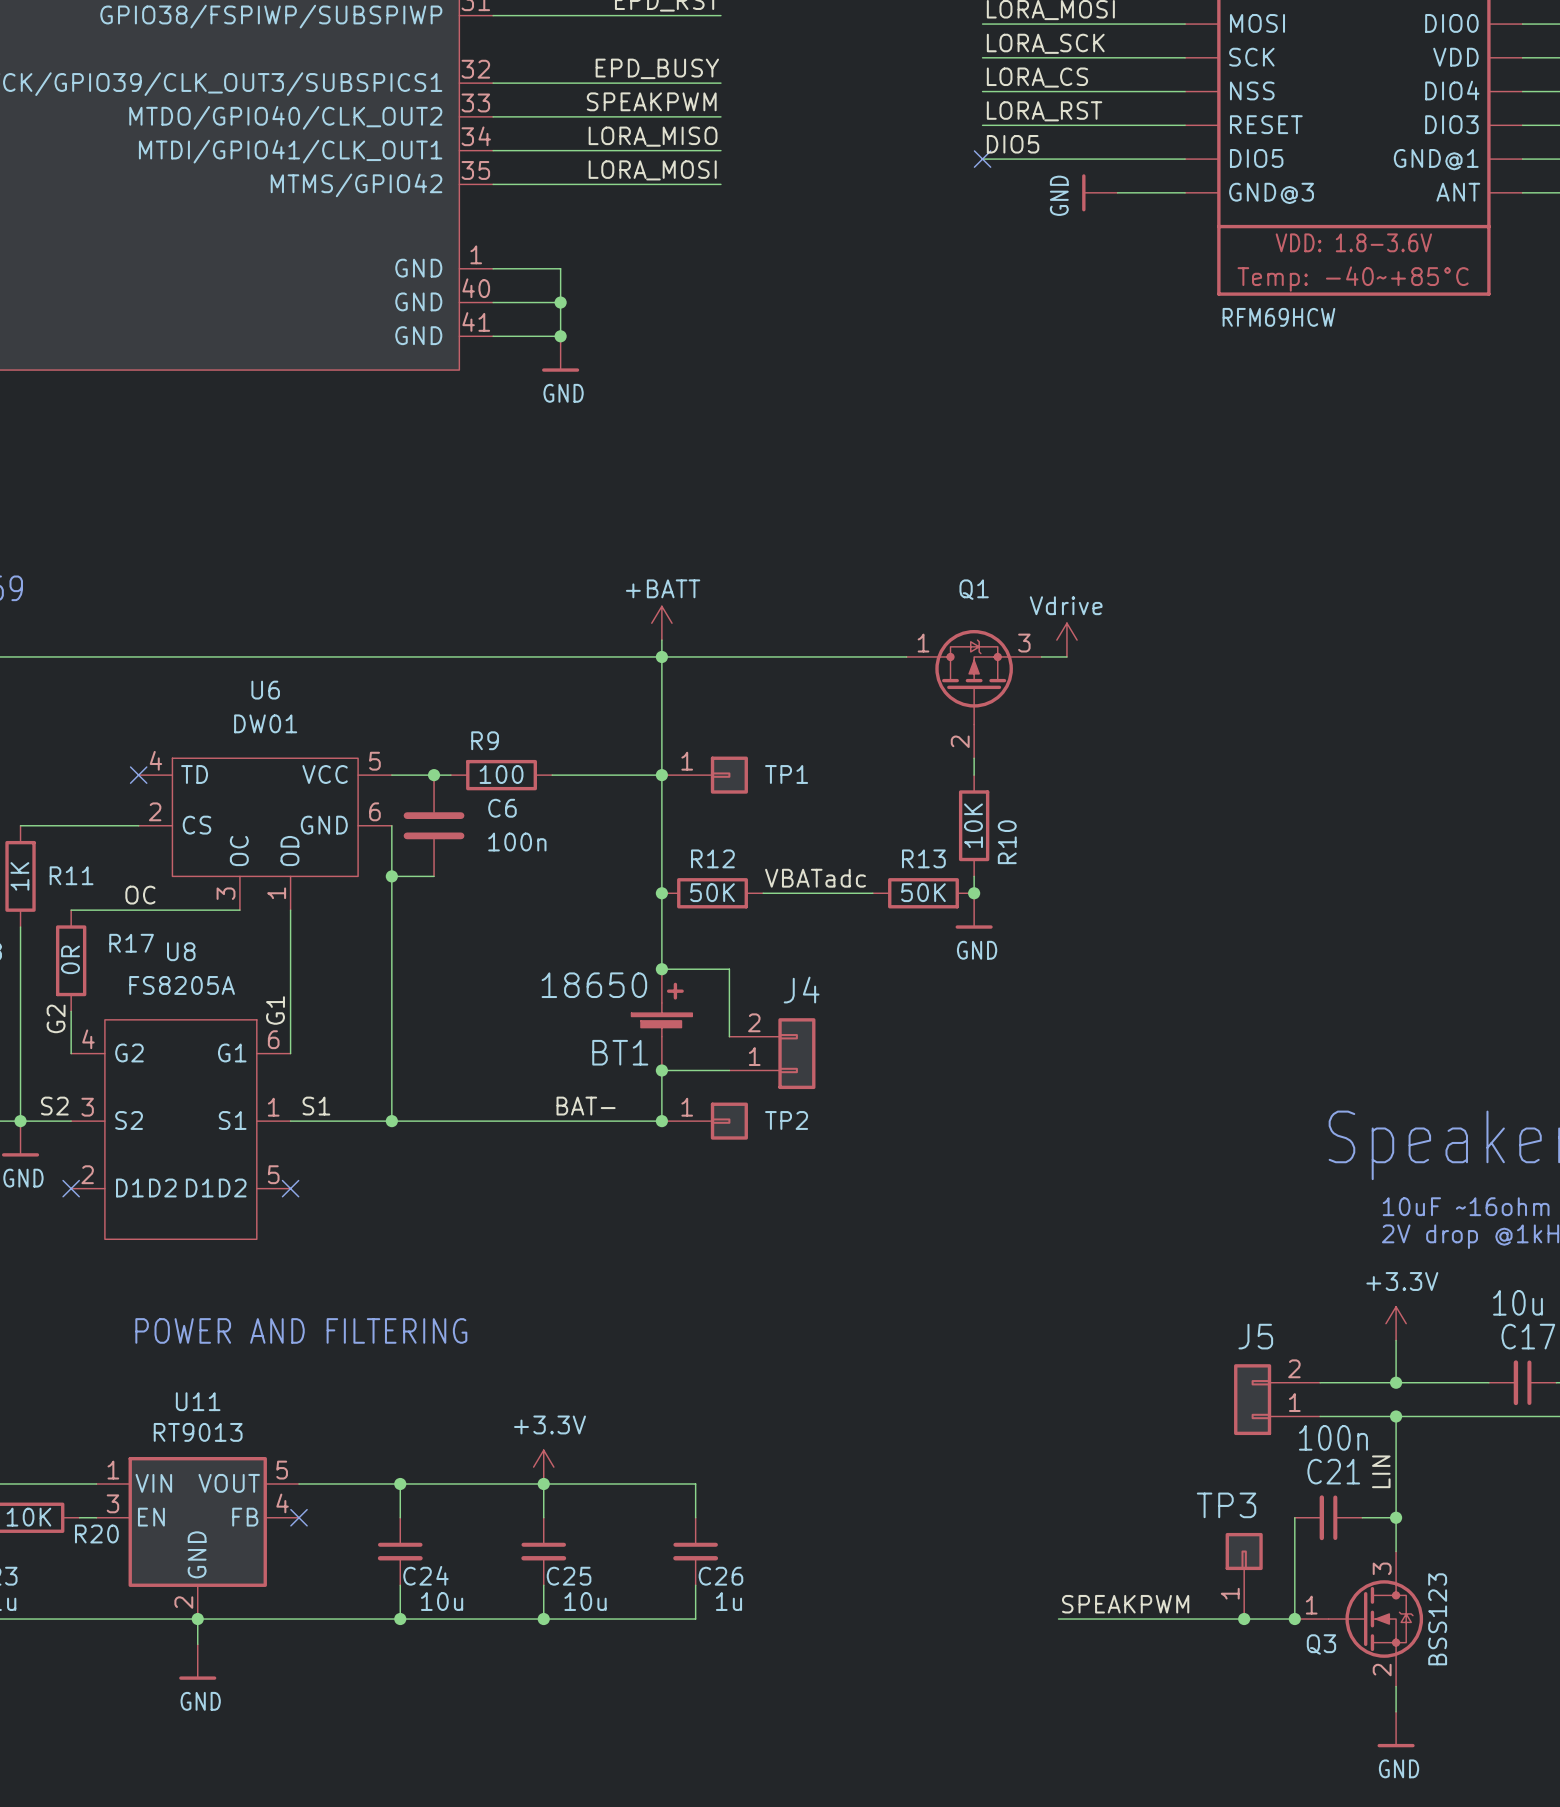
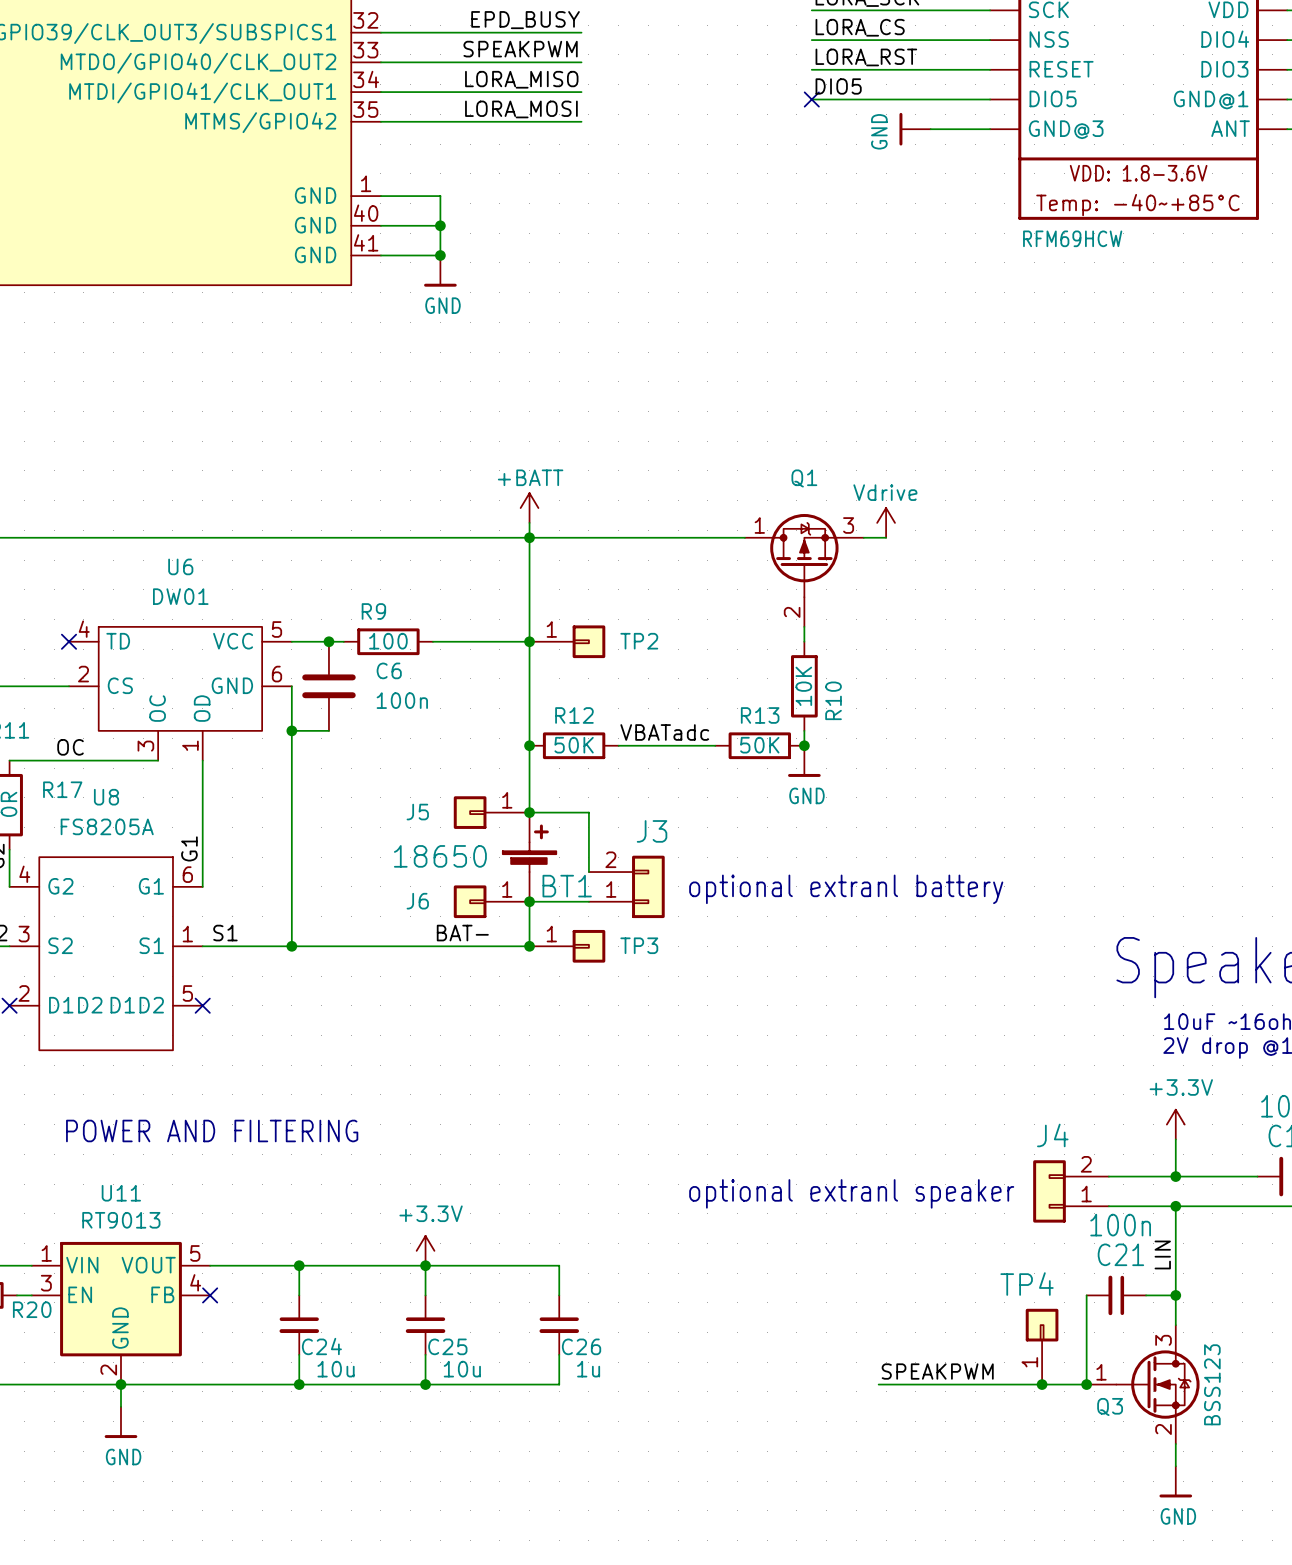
TP1 name: TP1 (786, 774) -> TP2 (639, 641)
J5: none -> (491, 812)
BT1 value position: 18650 (594, 985) -> 18650 (440, 856)
J4 name: J4 (801, 990) -> J3 (652, 831)
BT1 name position: BT1 (620, 1052) -> BT1 (567, 886)
text: none -> optional extranl battery (846, 889)
J6: none -> (491, 901)
TP2 name: TP2 (786, 1120) -> TP3 (639, 945)
J5 name: J5 (1255, 1336) -> J4 (1052, 1135)
text: none -> optional extranl speaker (851, 1193)
TP3 name: TP3 (1226, 1505) -> TP4 (1027, 1284)

